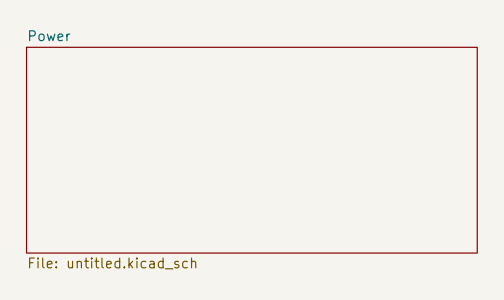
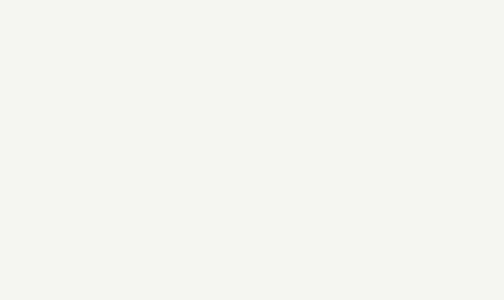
sheet Power: File: untitled.kicad_sch (251, 150) -> none

